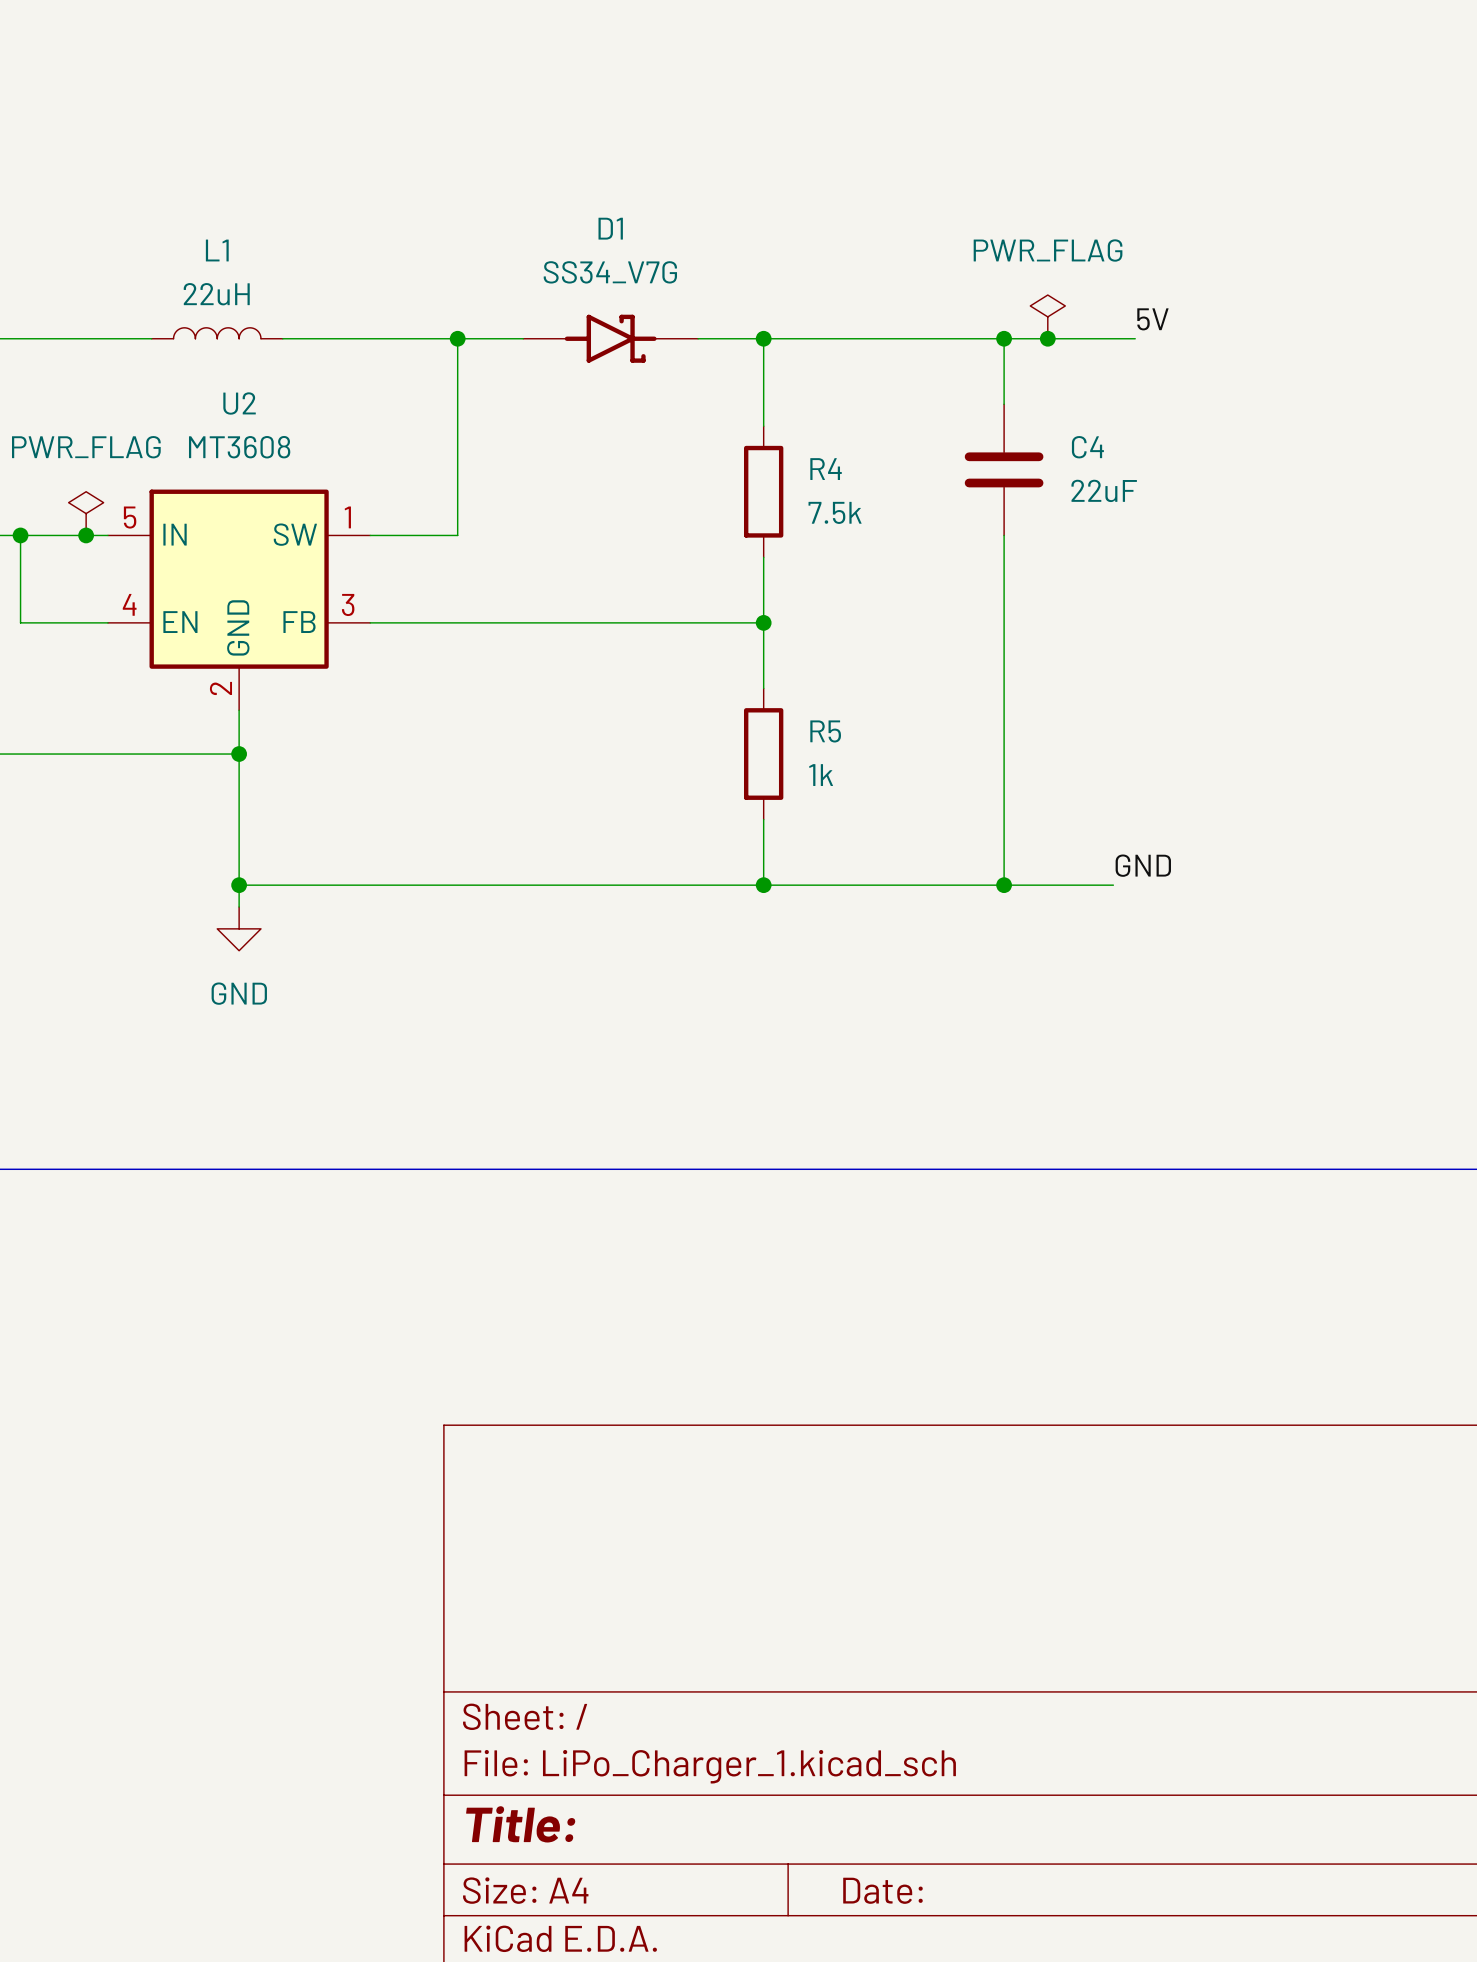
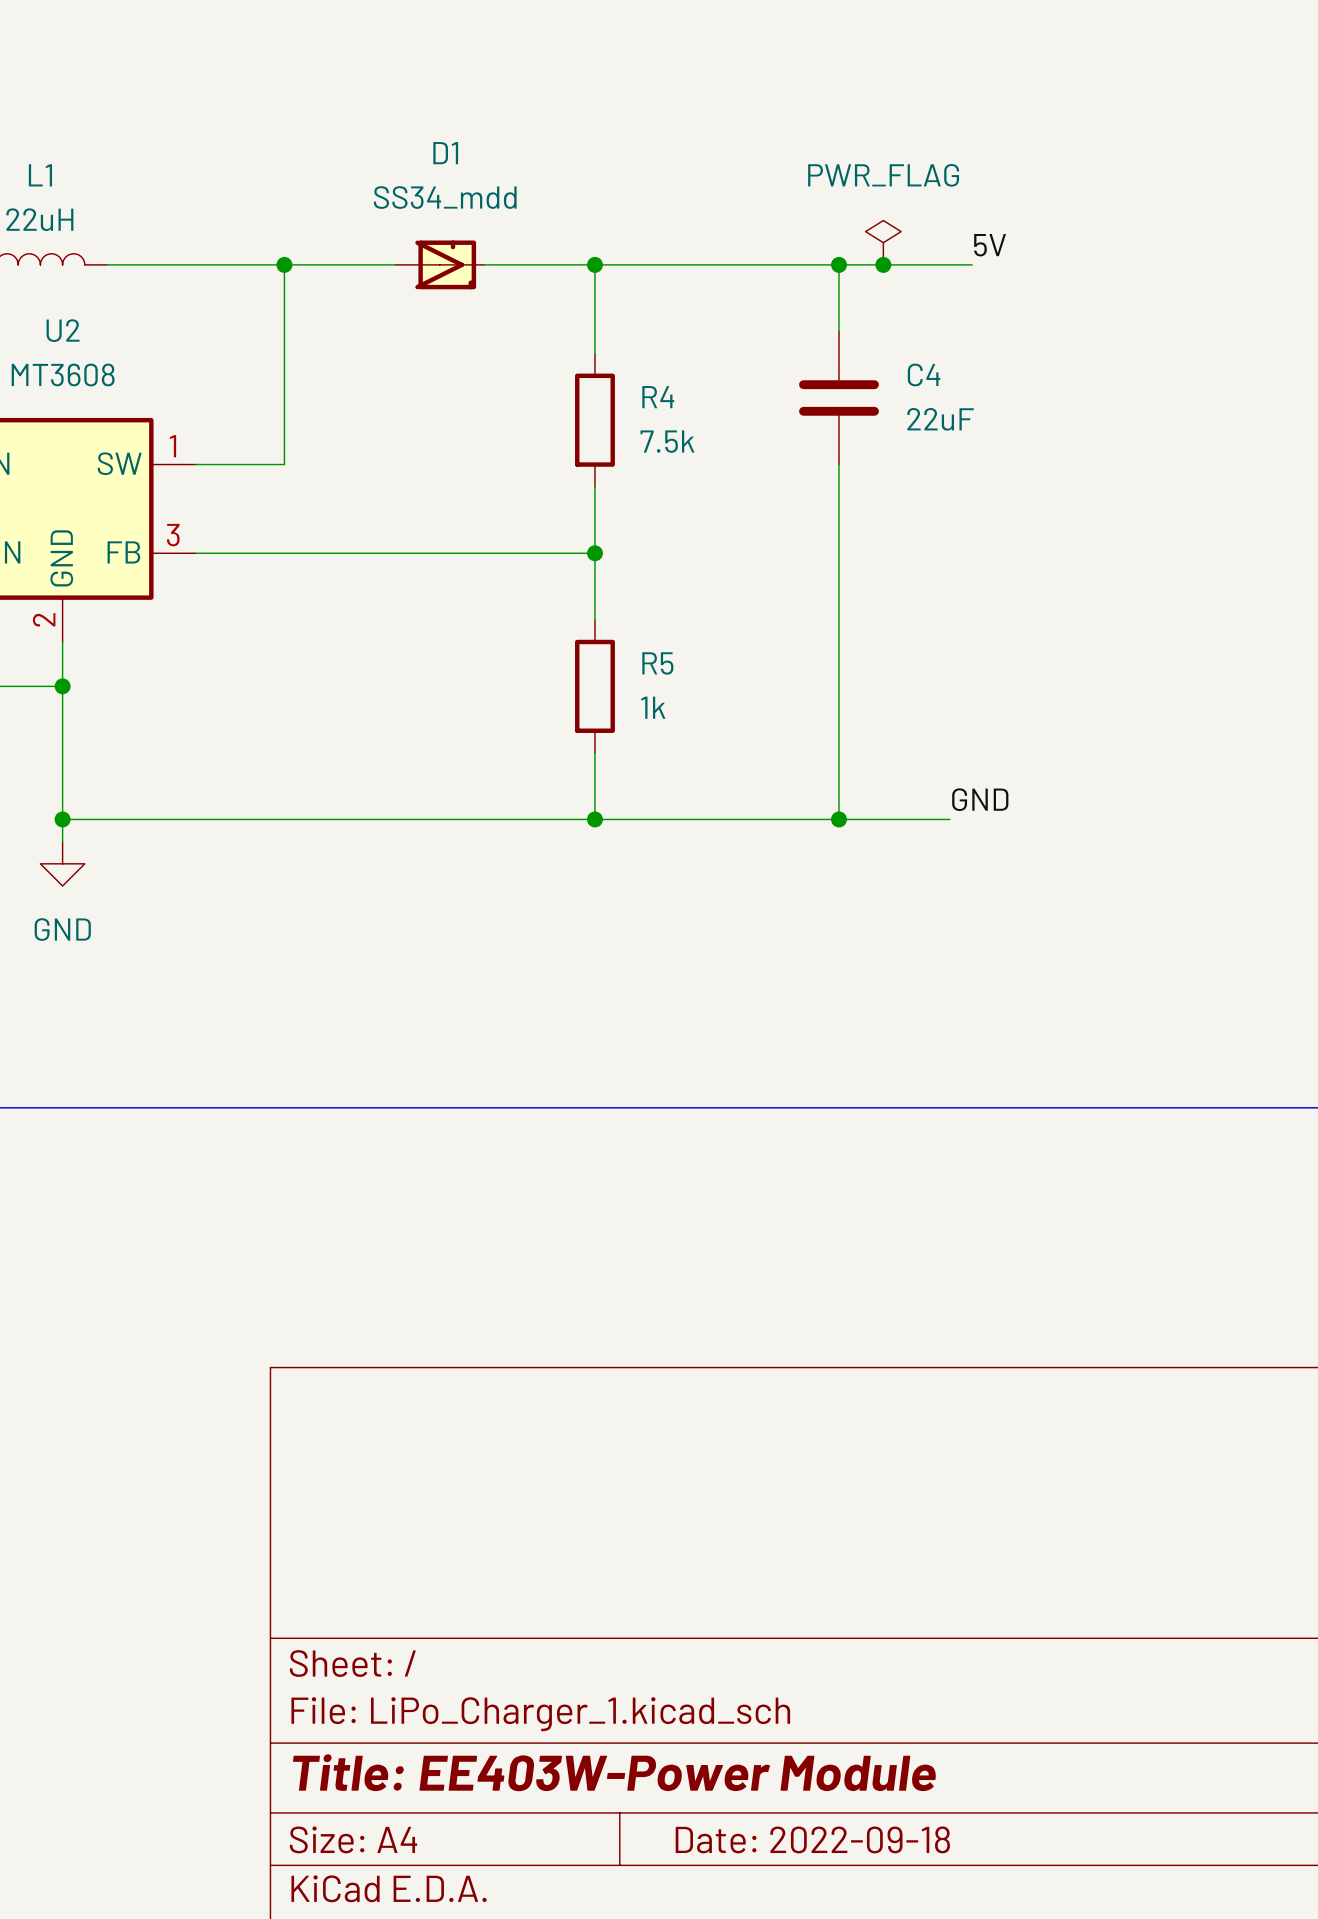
D1 value: SS34_V7G (610, 272) -> SS34_mdd (445, 197)
D1 symbol: [523, 314, 699, 363] -> [395, 240, 485, 290]
title block: Title: (520, 1824) -> Title: EE403W-Power Module (614, 1772)
title block: Date: (882, 1890) -> Date: 2022-09-18 (812, 1839)

